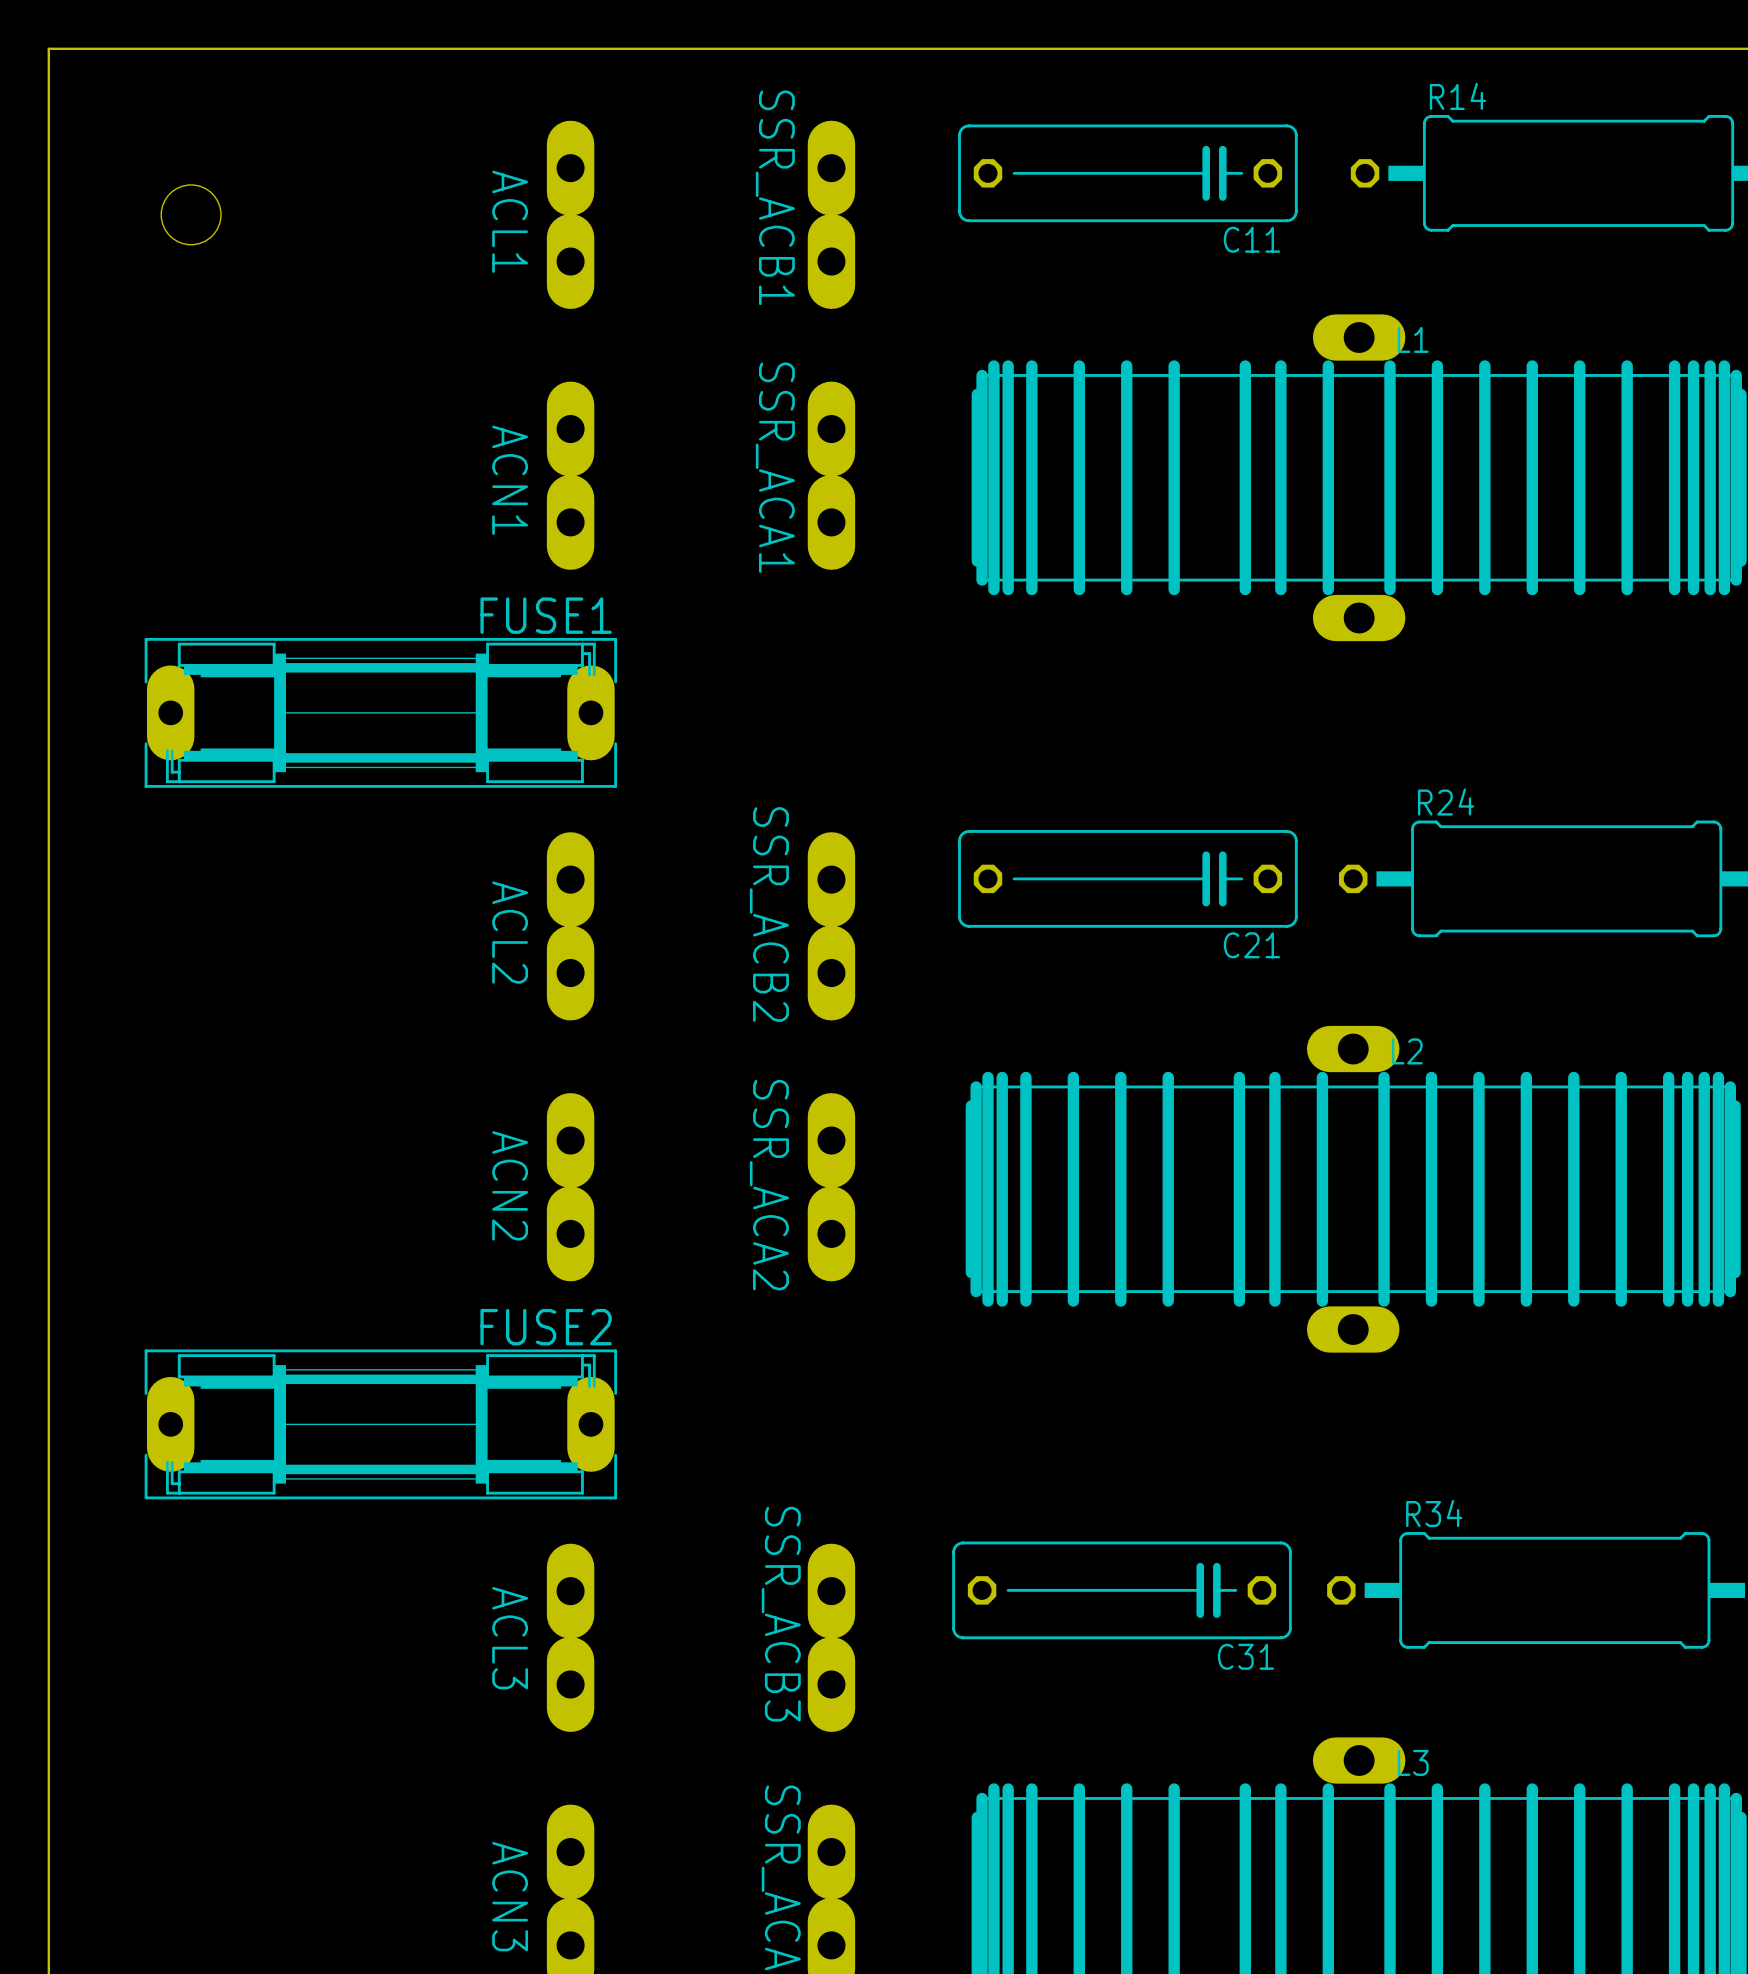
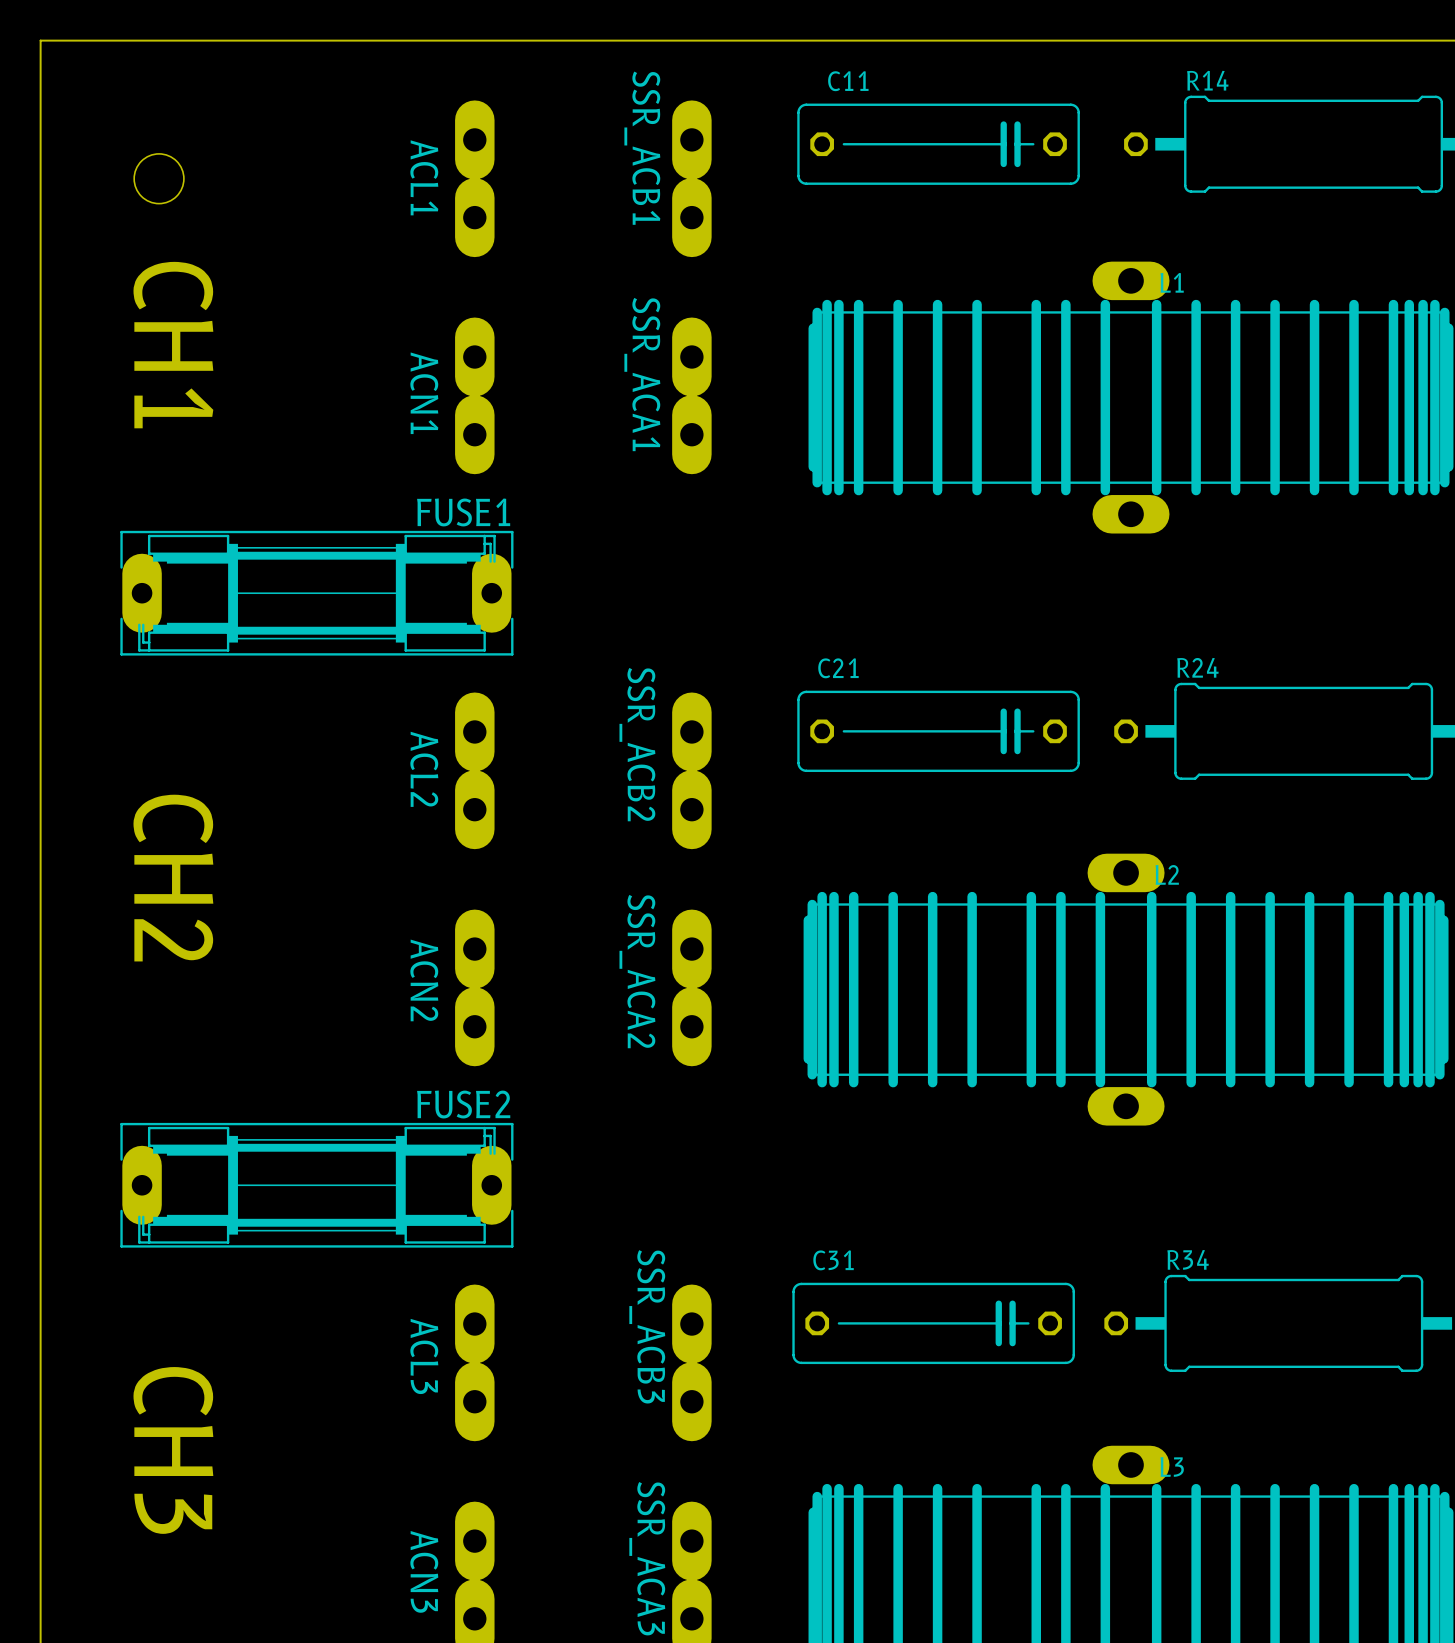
C11 name position: C11 (1251, 239) -> C11 (848, 81)
text: none -> CH1 (173, 345)
C21 name position: C21 (1251, 945) -> C21 (838, 668)
text: none -> CH2 (173, 878)
C31 name position: C31 (1245, 1656) -> C31 (833, 1260)
text: none -> CH3 (173, 1450)

